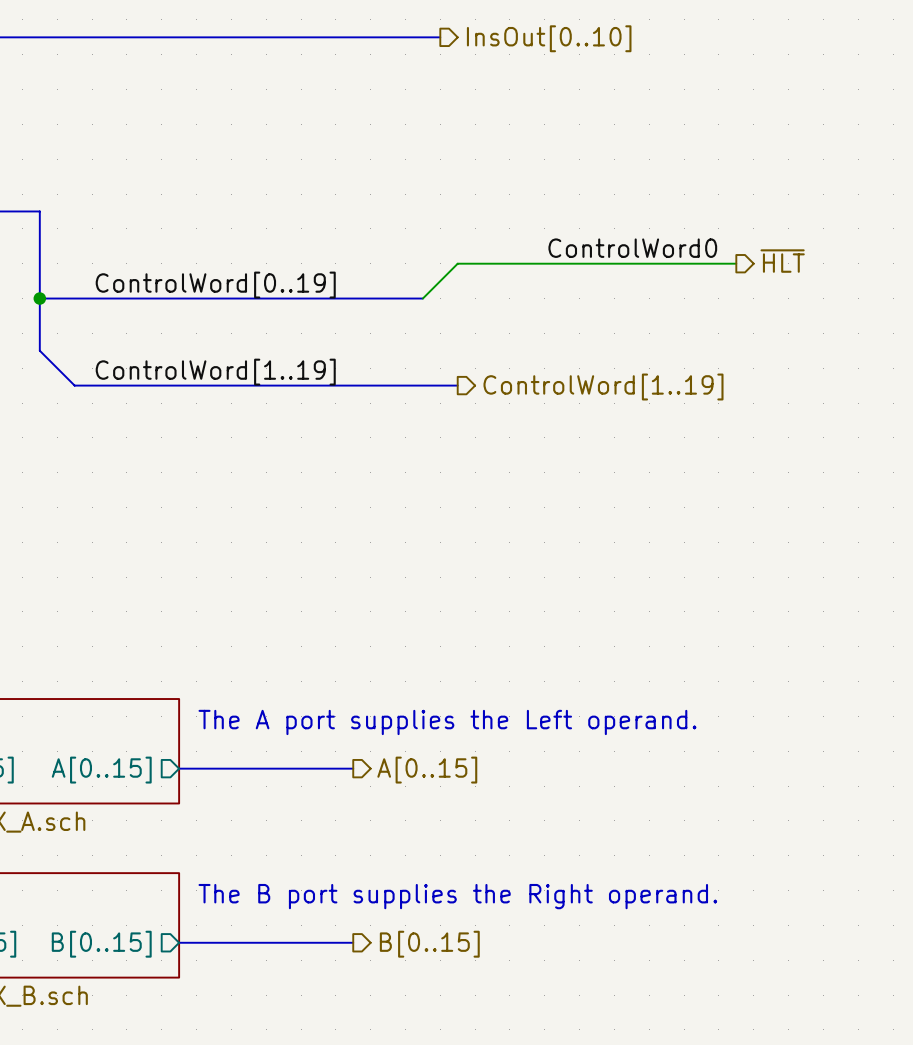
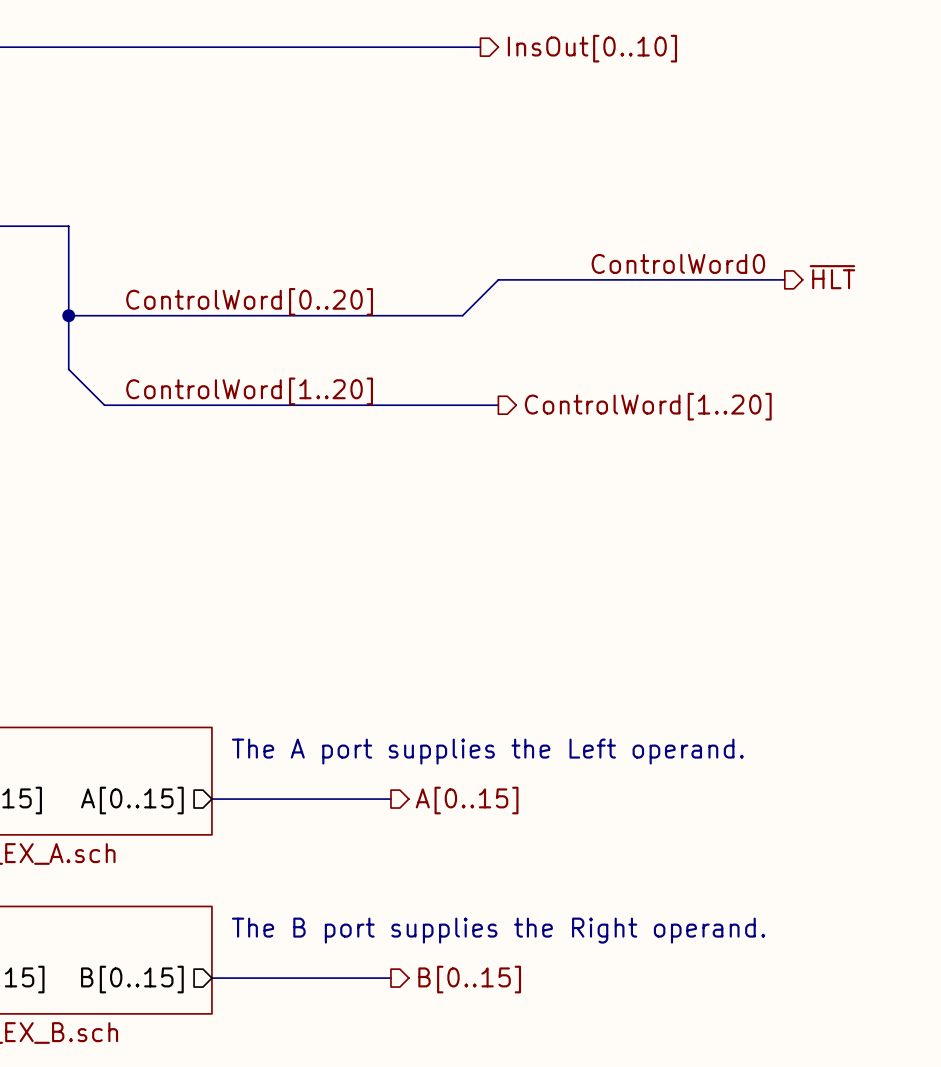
label: ControlWord[0..19] (215, 285) -> ControlWord[0..20] (249, 301)
label: ControlWord[1..19] (215, 372) -> ControlWord[1..20] (249, 391)
hierarchical label: ControlWord[1..19] (603, 387) -> ControlWord[1..20] (648, 406)

